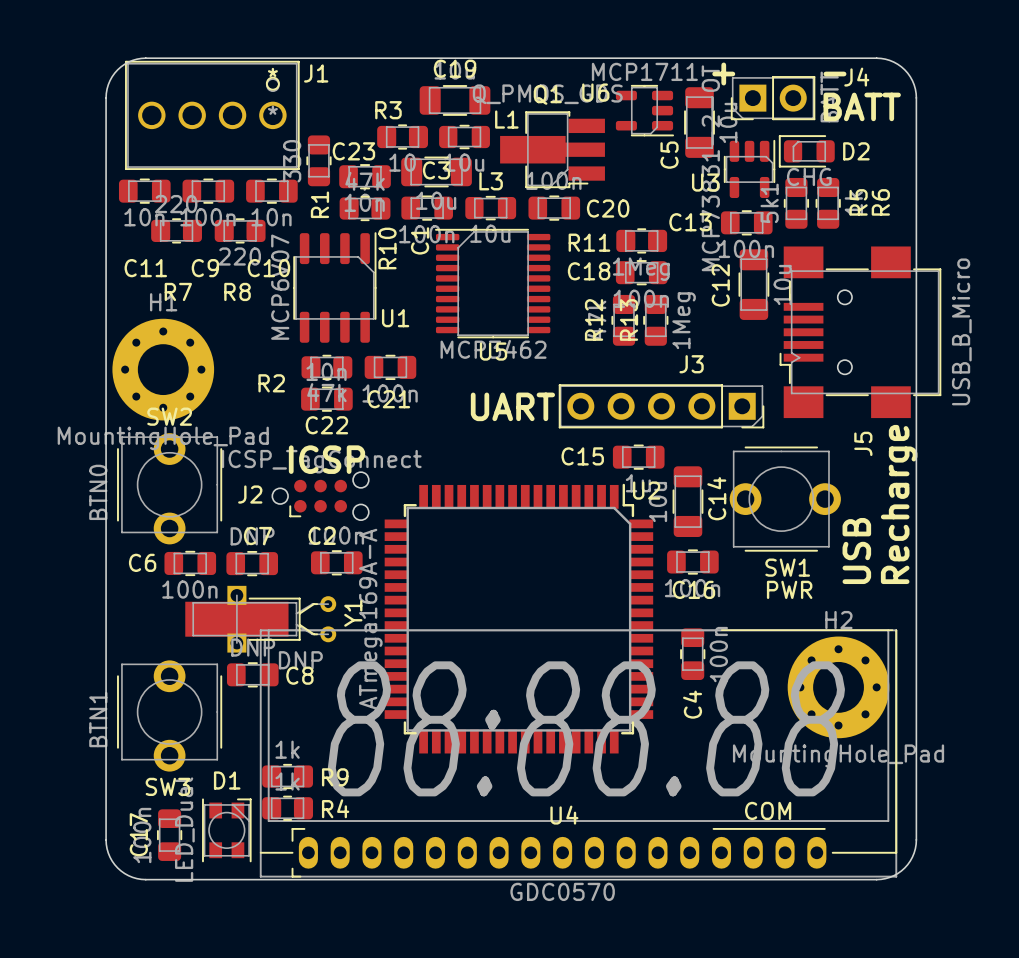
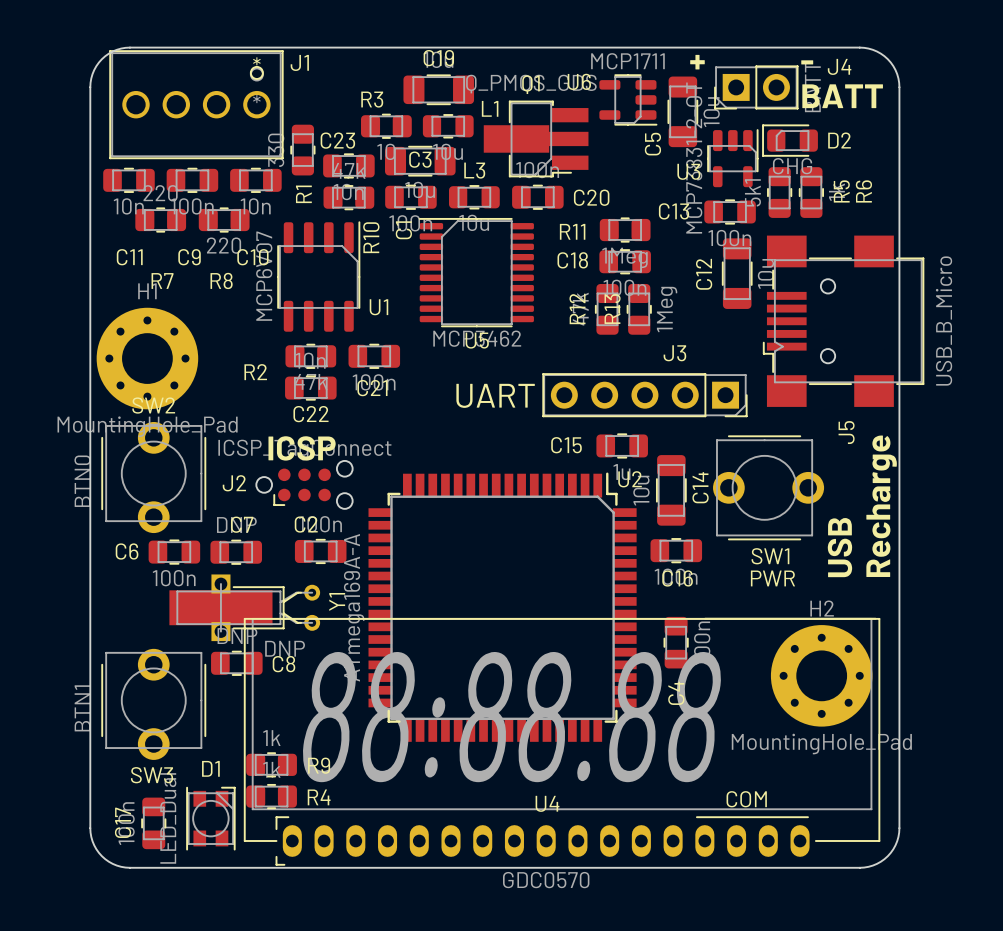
U4 footprint: [259, 629, 898, 878] -> [243, 617, 881, 866]

